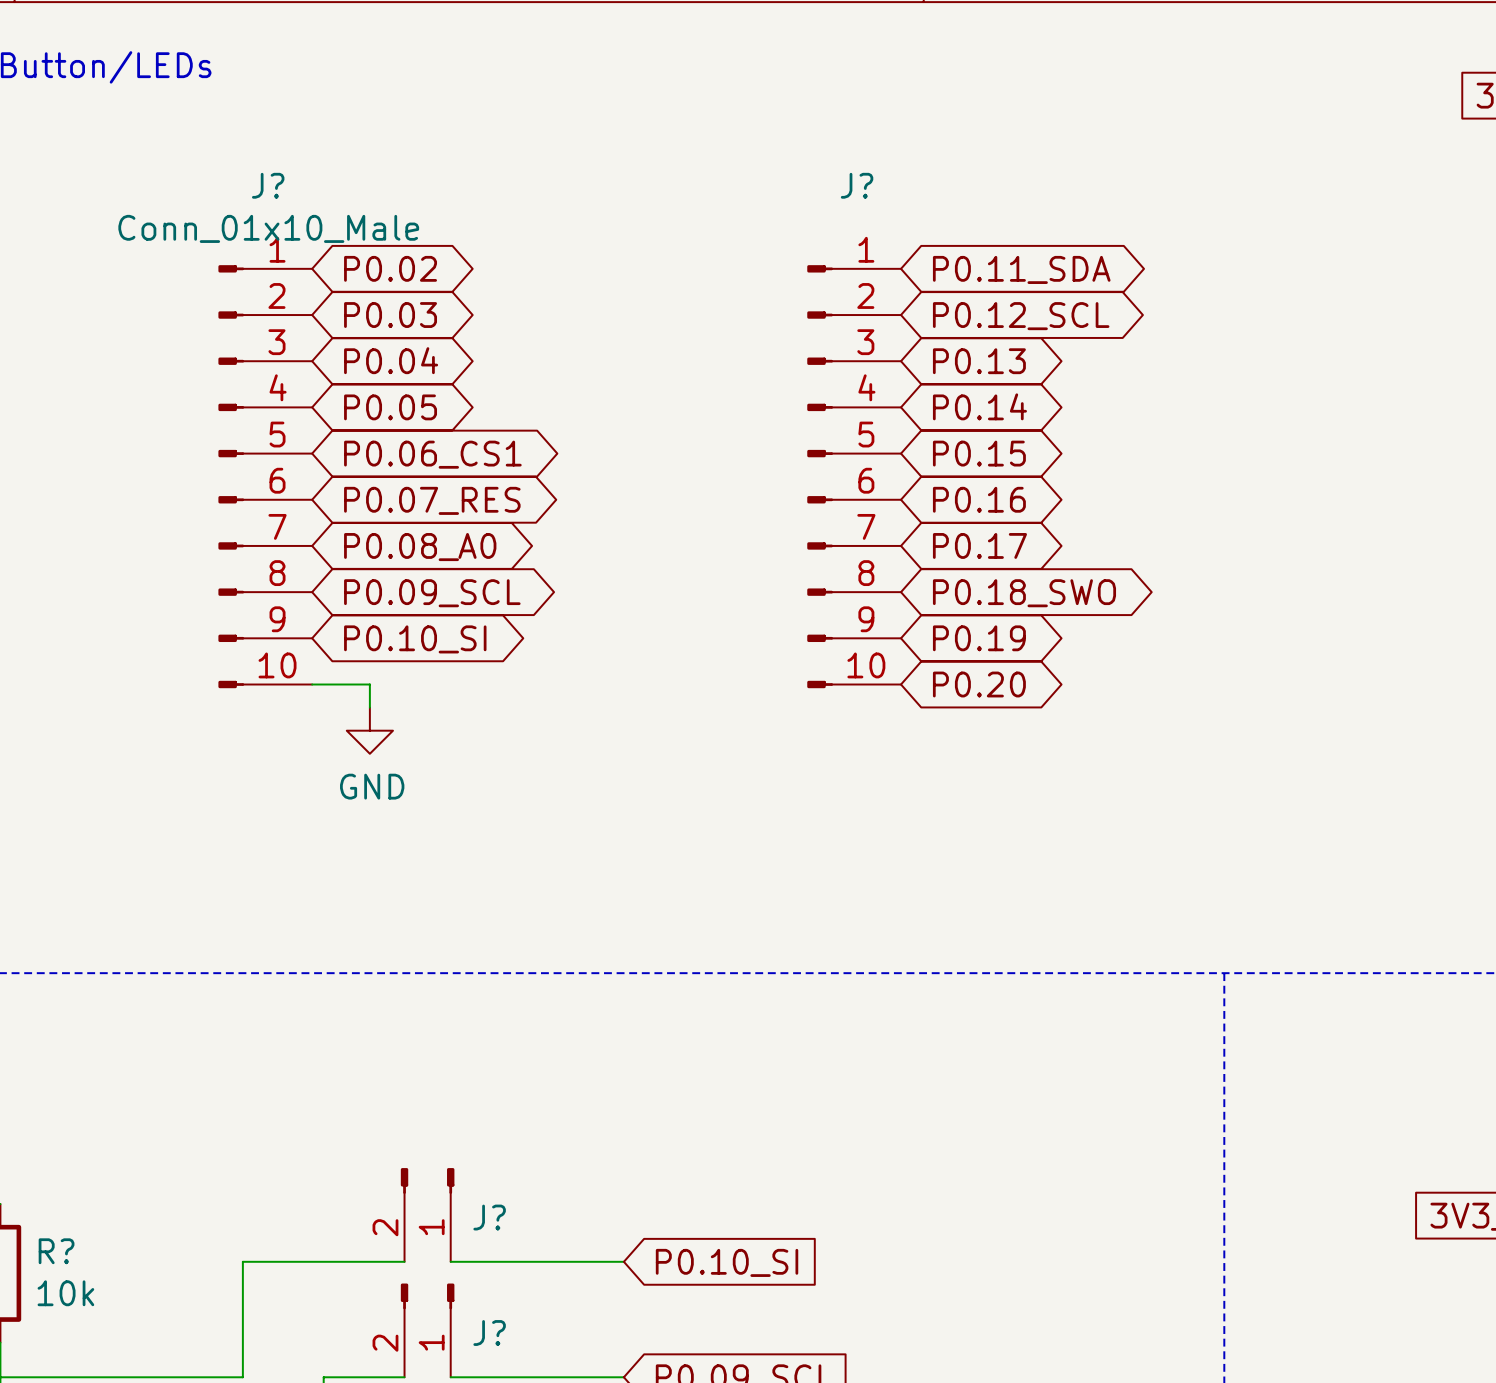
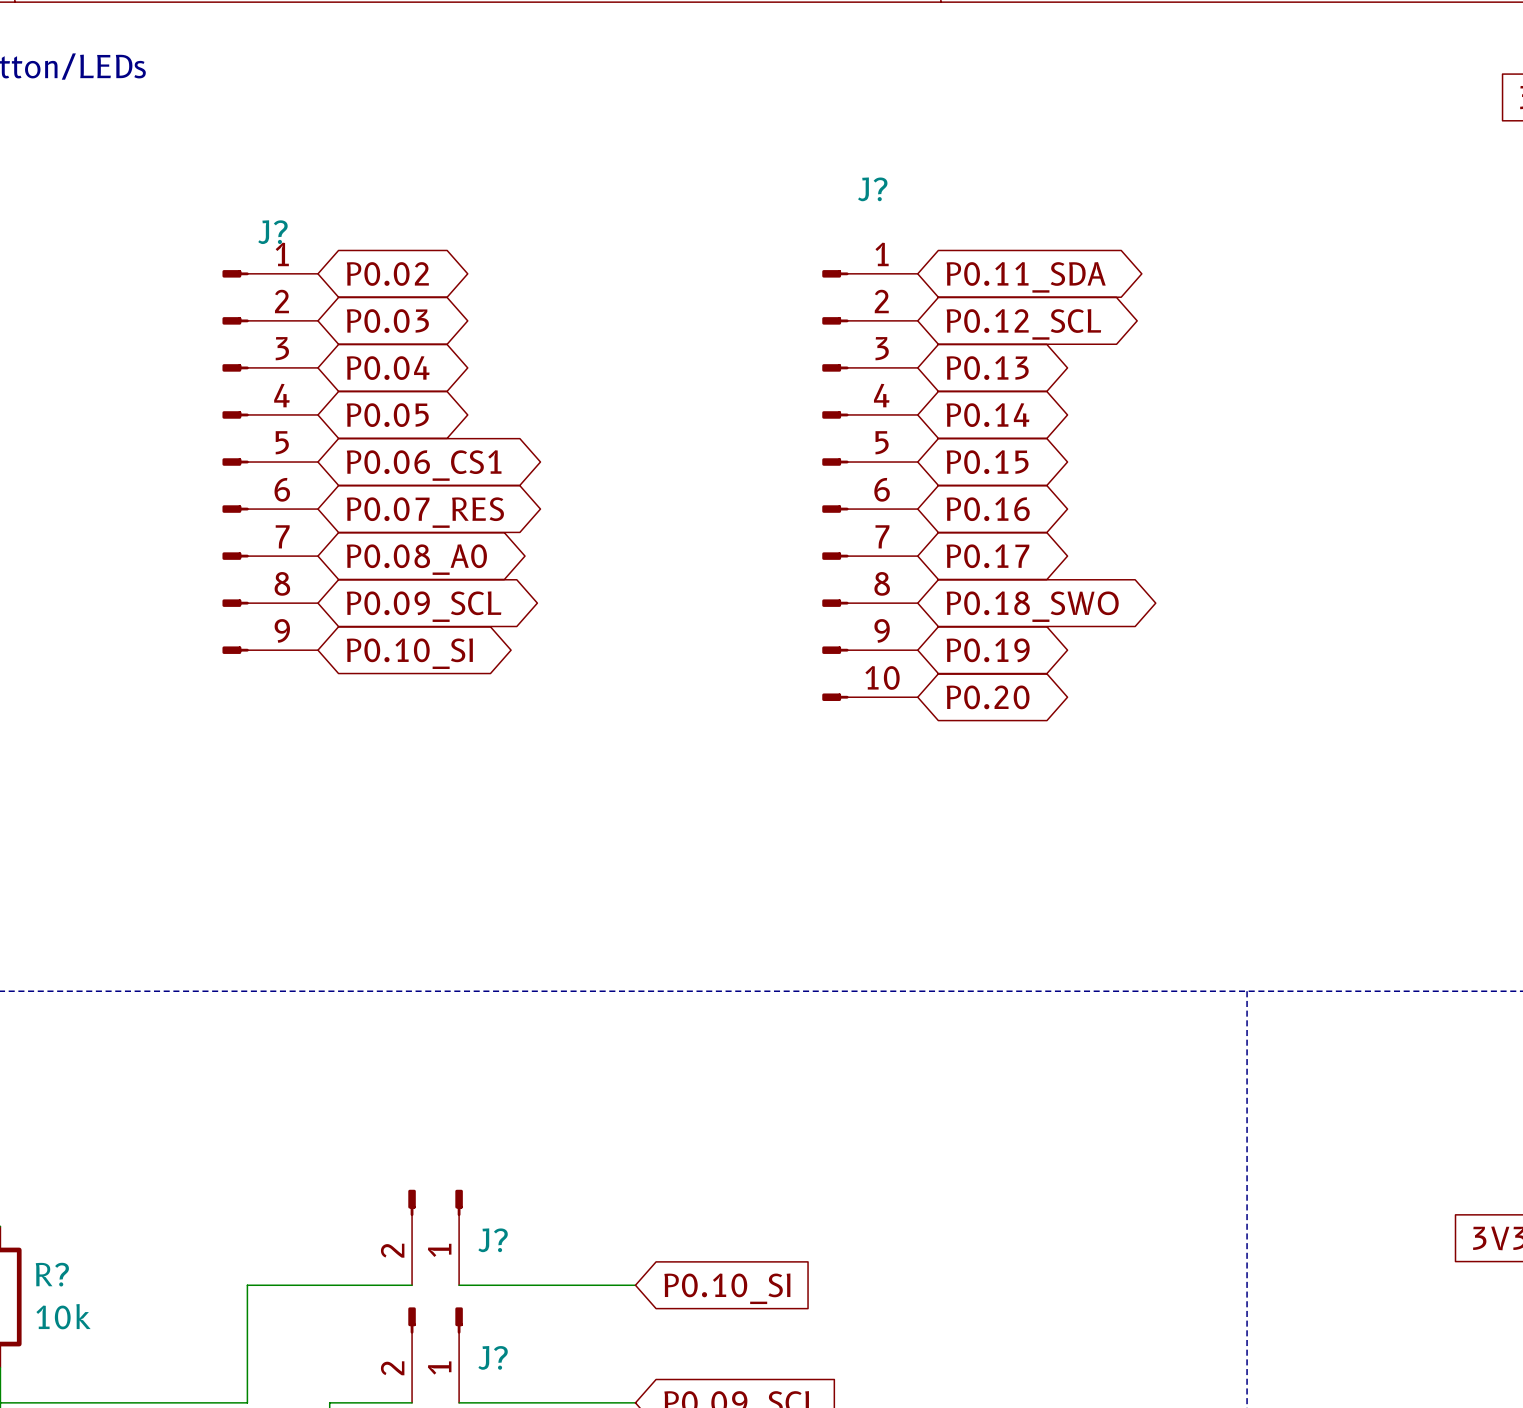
J?: none -> (270, 462)
J?: Conn_01x10_Male (265, 476) -> none
wire: (312, 684) (369, 684) (369, 707) -> none
power symbol: GND (369, 730) -> none

